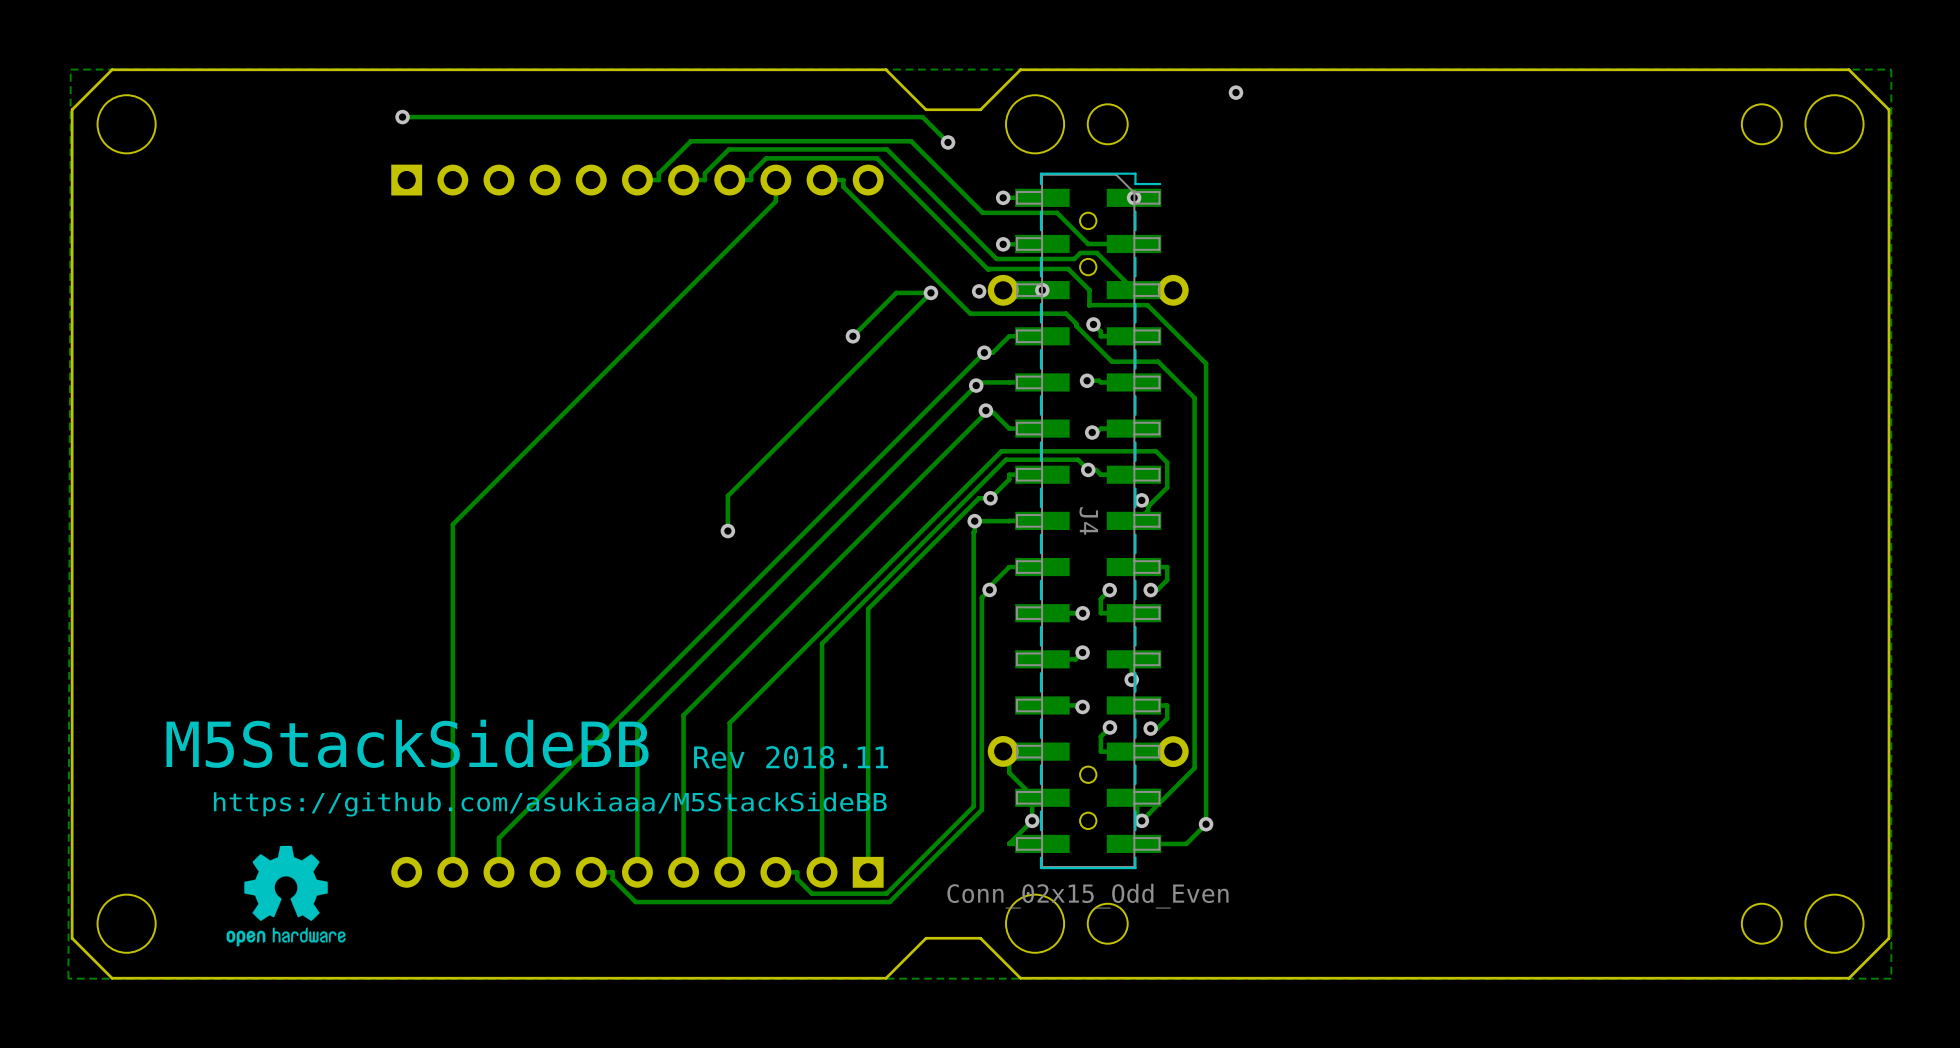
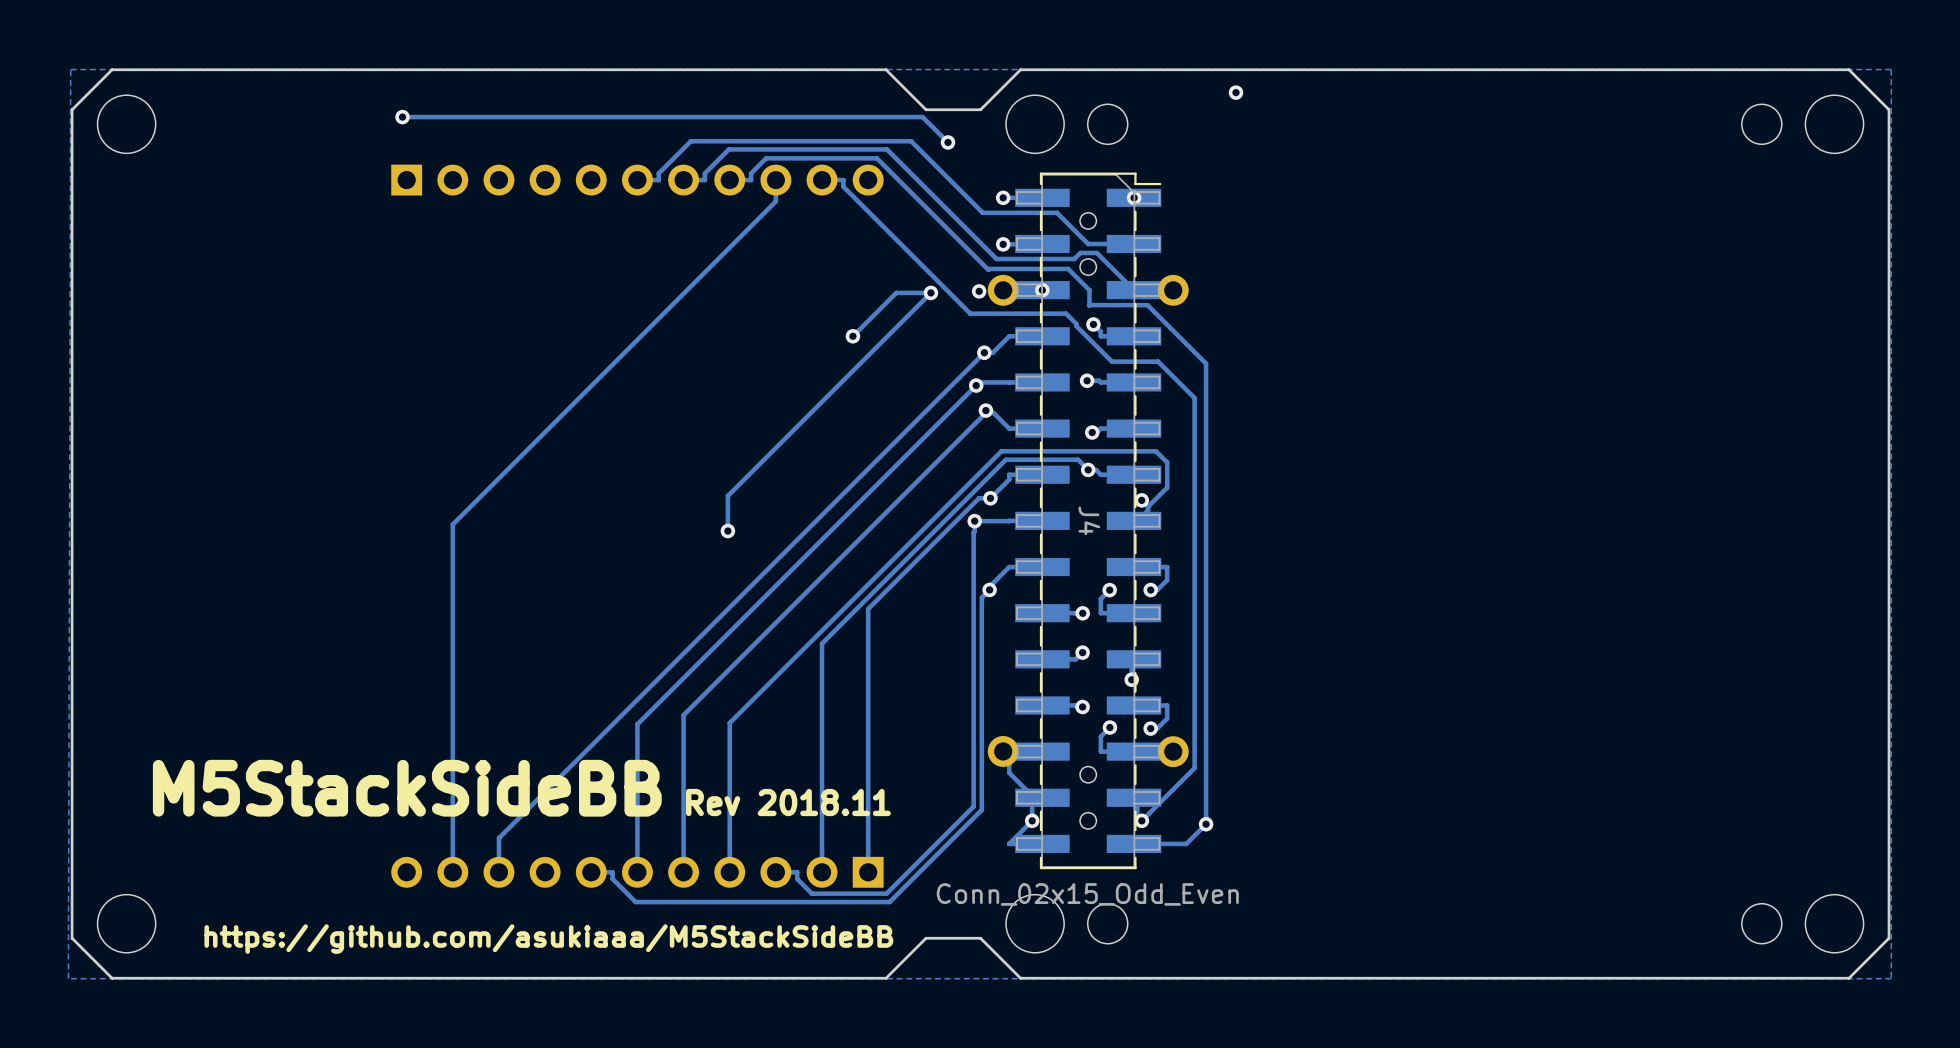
text position: M5StackSideBB (407, 743) -> M5StackSideBB (407, 788)
text position: Rev 2018.11 (791, 757) -> Rev 2018.11 (788, 802)
text position: https://github.com/asukiaaa/M5StackSideBB (550, 804) -> https://github.com/asukiaaa/M5StackSideBB (548, 939)
drawing: [226, 845, 346, 947] -> none

